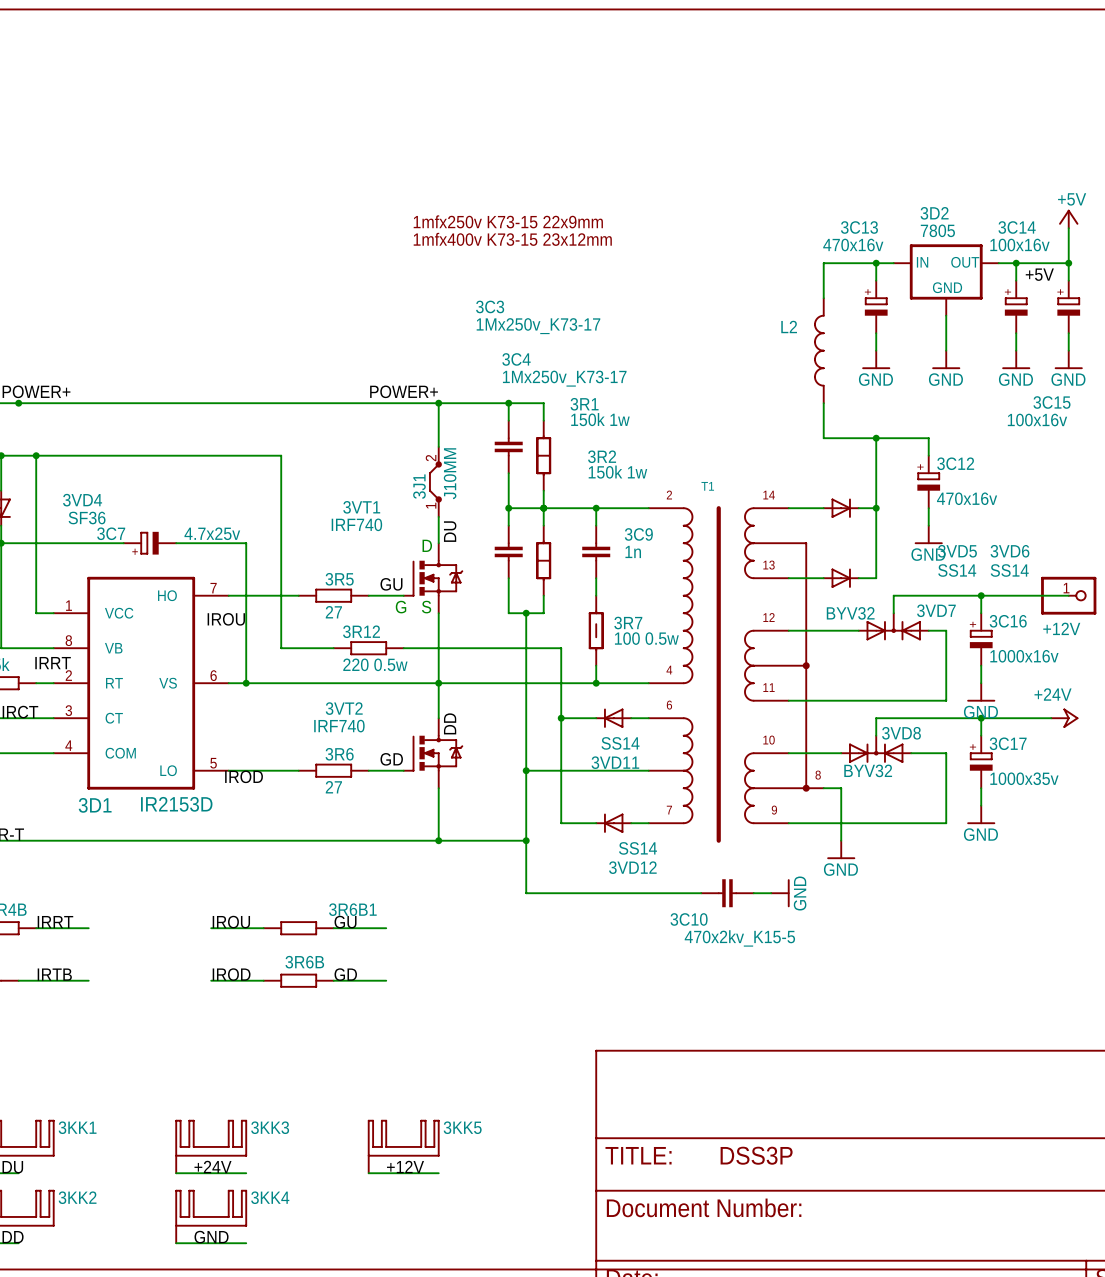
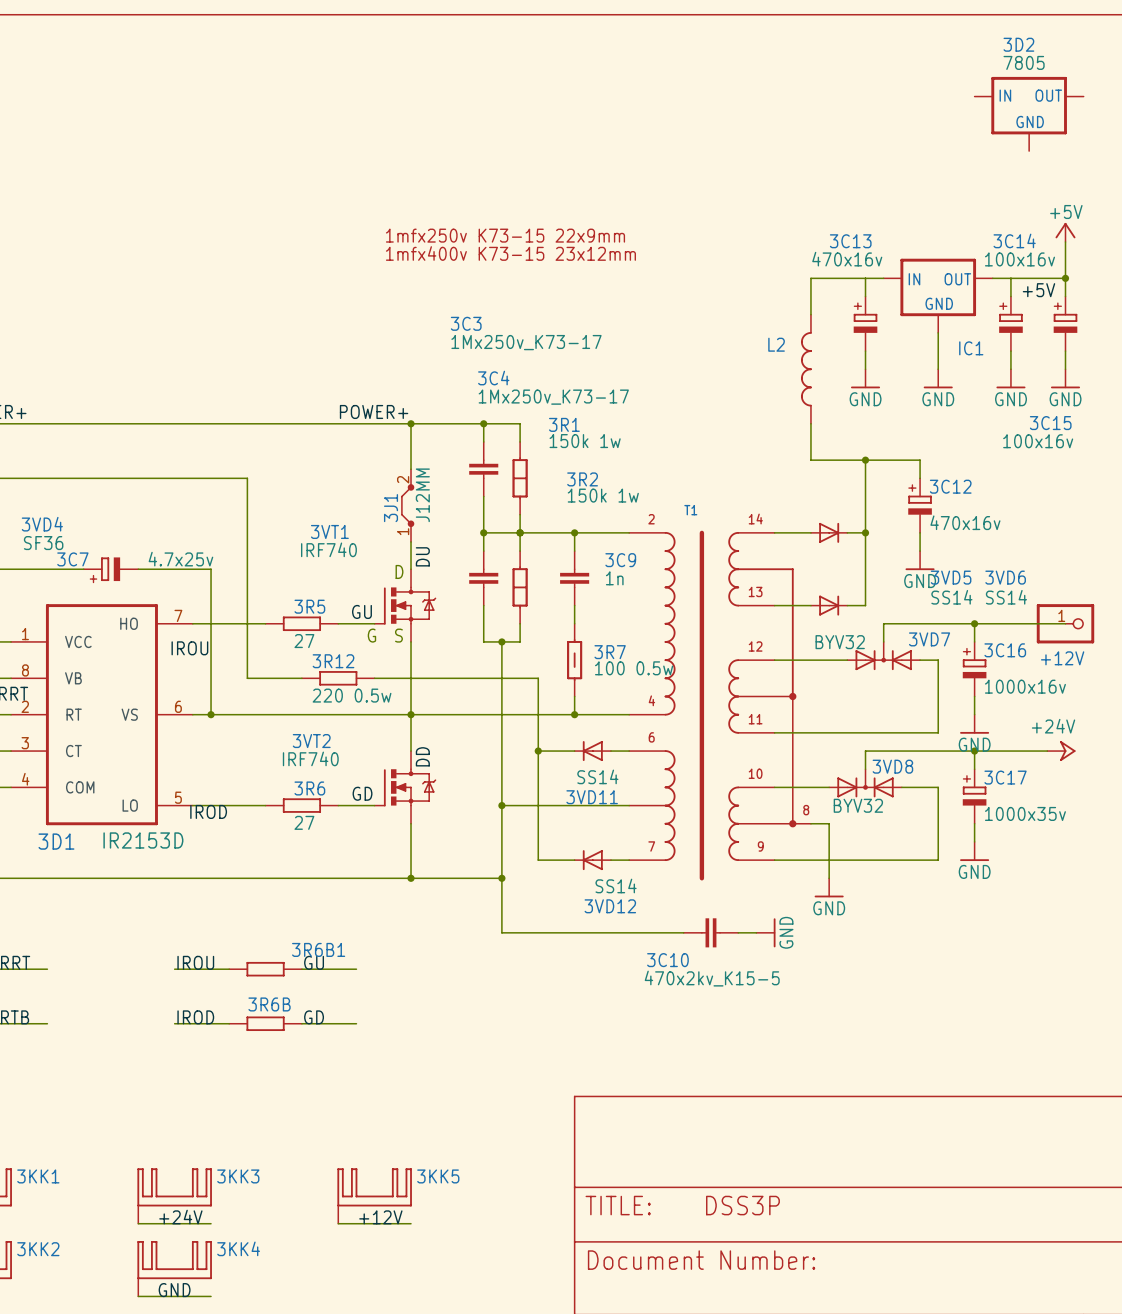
junction: (876, 263) -> none
junction: (1016, 263) -> none
3D2 position: (946, 280) -> (1029, 114)
IC1: none -> (938, 295)
3J1 value: J10MM (450, 473) -> J12MM (422, 495)

